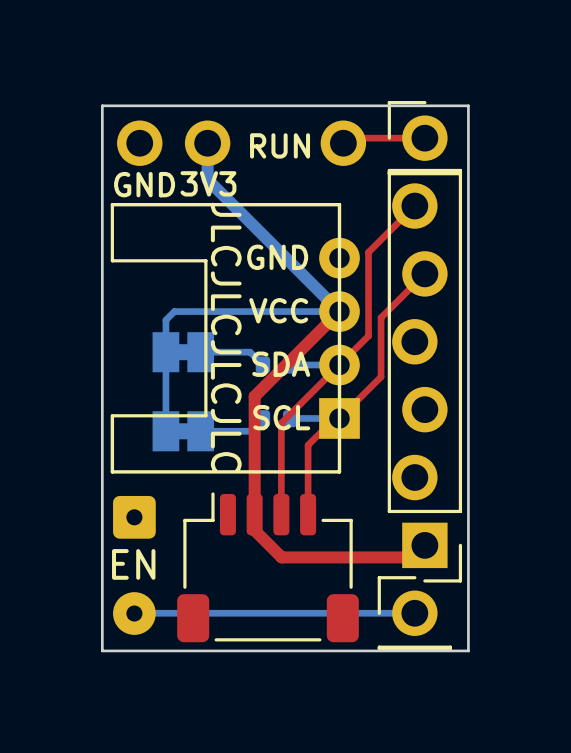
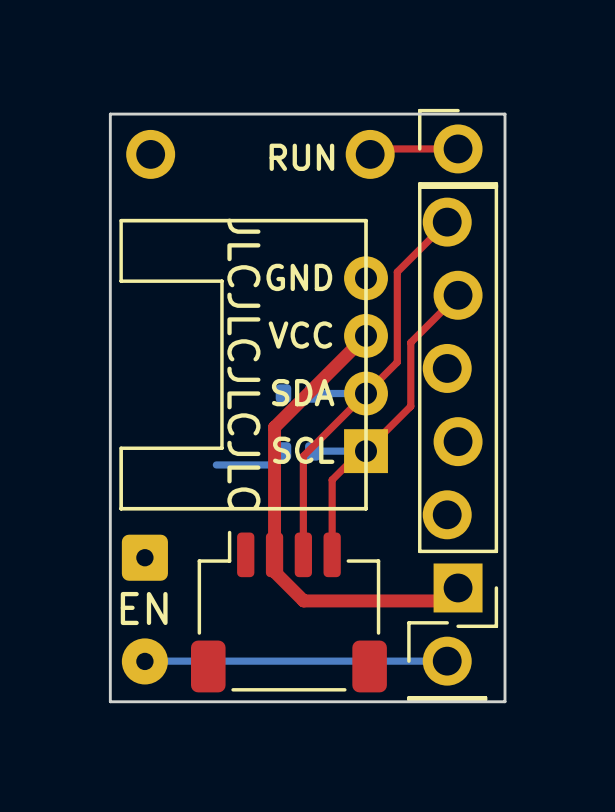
bottom track: (207, 143) (207, 179) (339, 311) (174, 311) (165, 320) (165, 431) -> none
part: (207, 143) -> none
text: 3V3 (208, 183) -> none
text: GND (144, 184) -> none
part: (183, 352) -> none
bottom track: (200, 352) (250, 352) (262, 365) -> none
part: (183, 431) -> none

